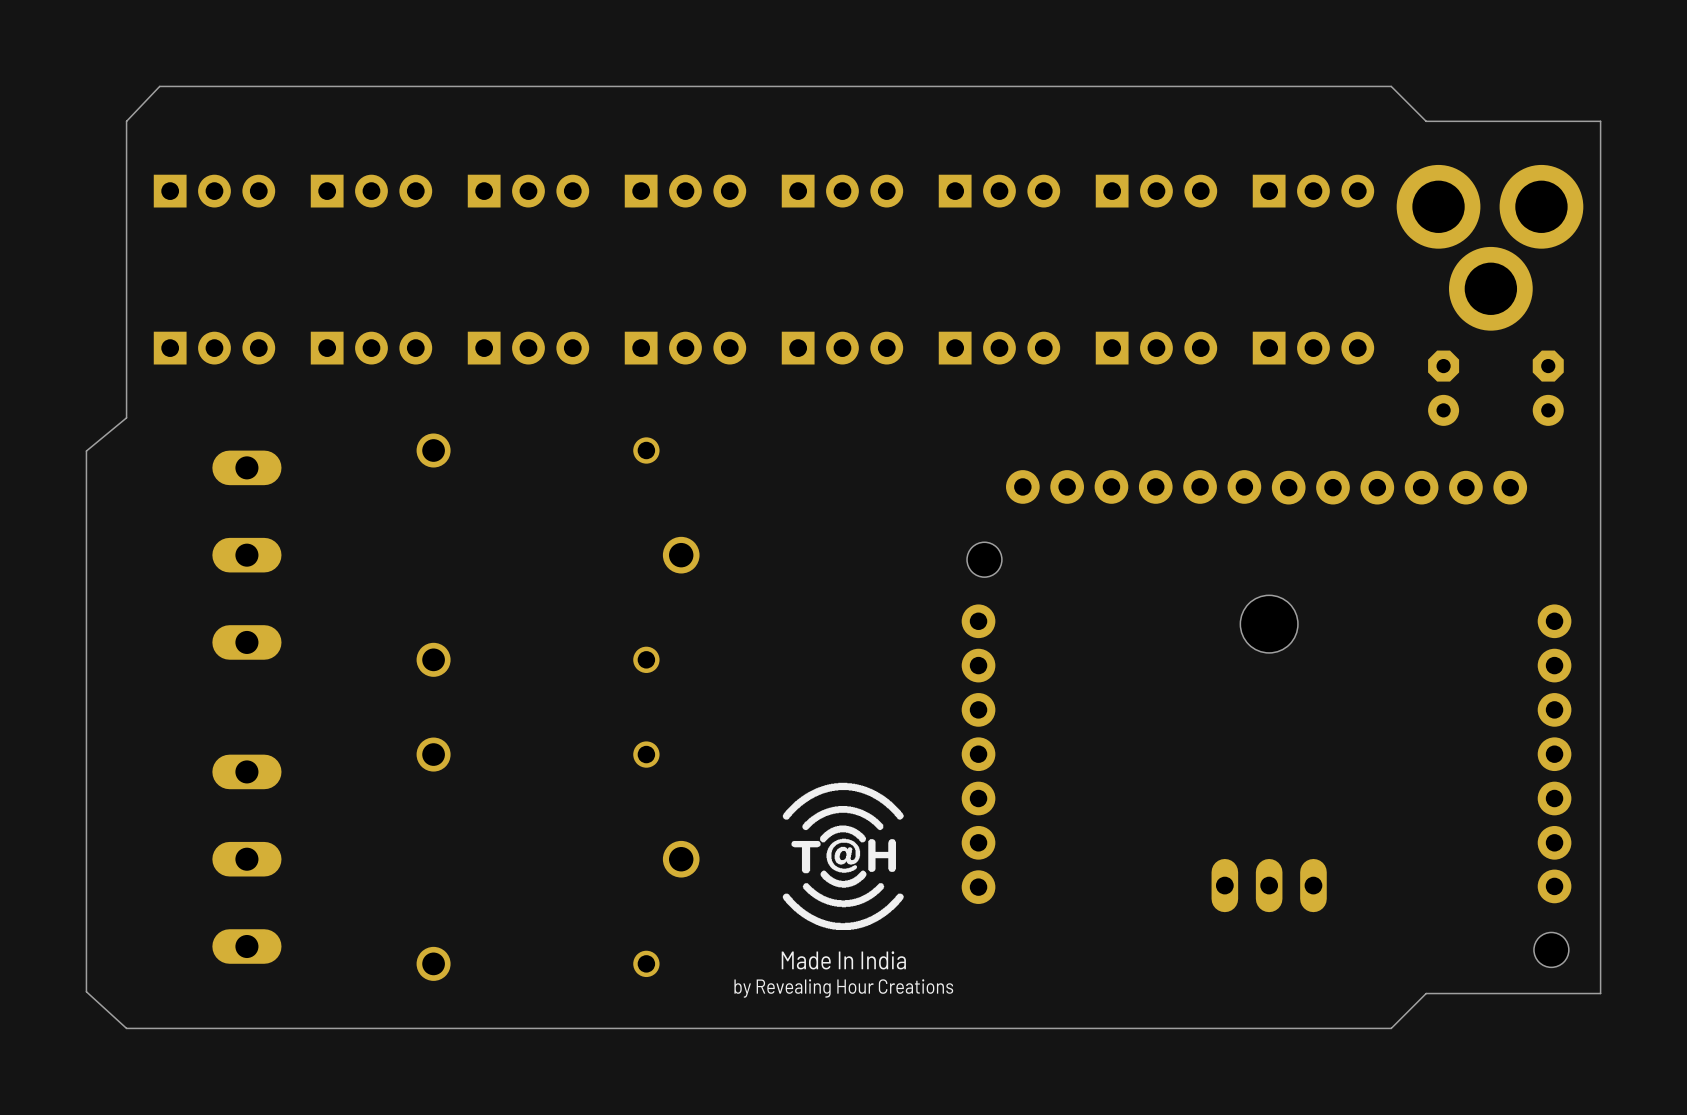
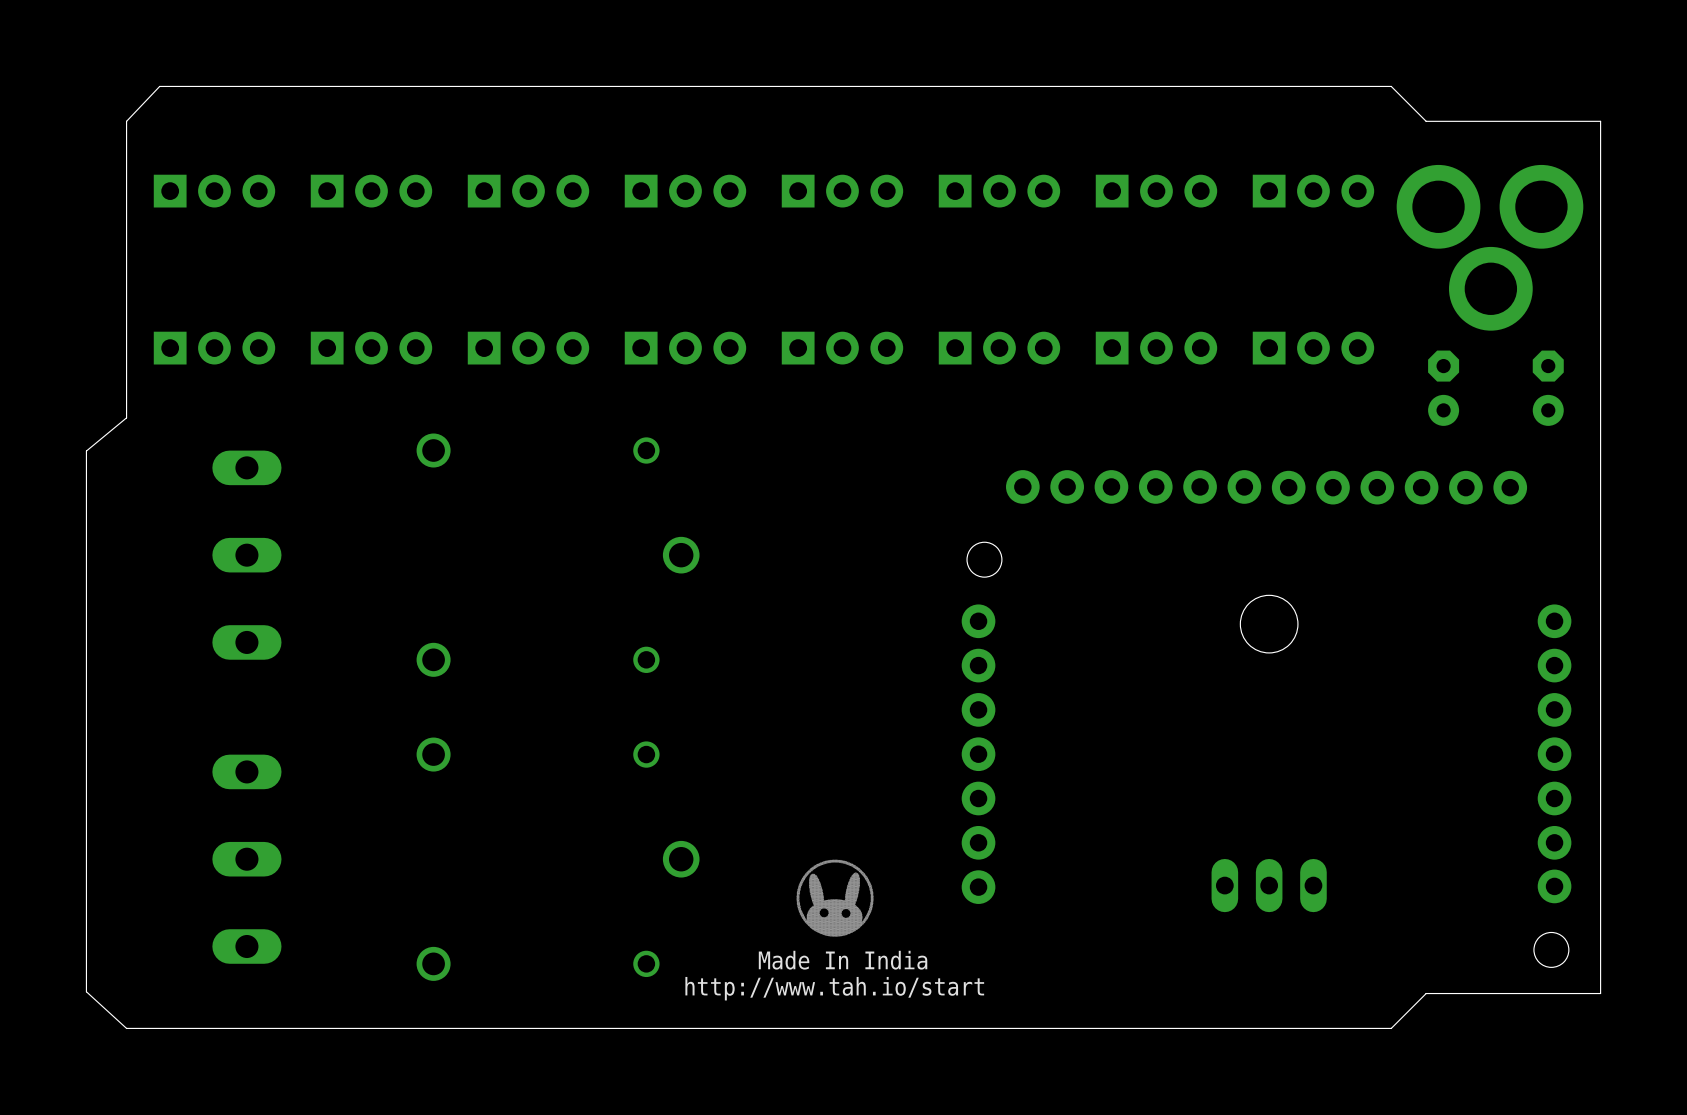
drawing: [782, 782, 904, 931] -> none
drawing: none -> [796, 859, 874, 937]
text: by Revealing Hour Creations (843, 988) -> http://www.tah.io/start (834, 988)

